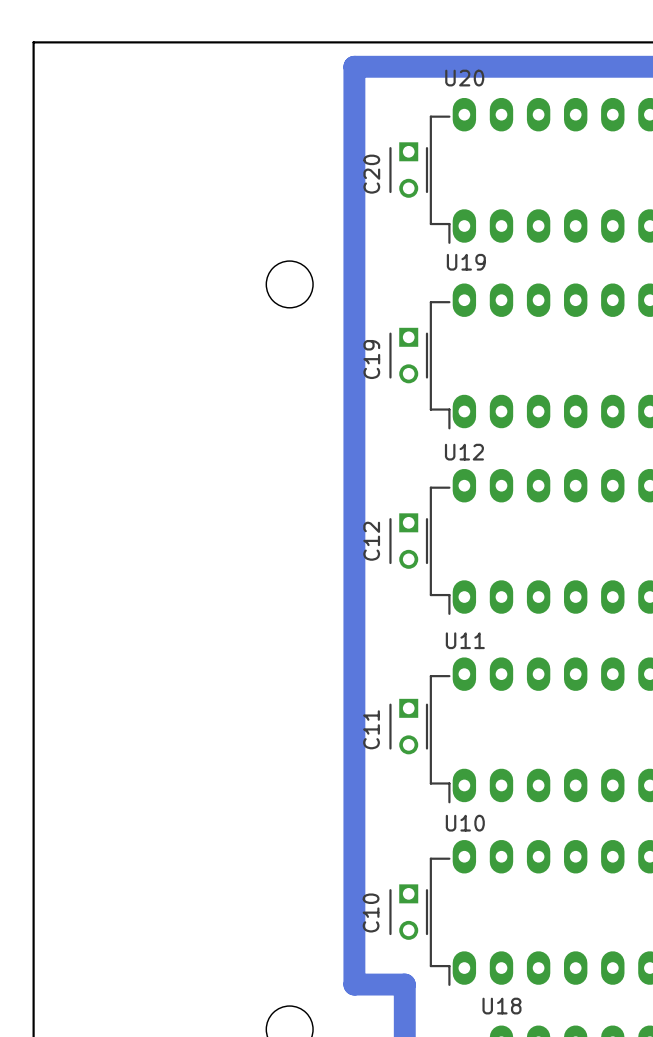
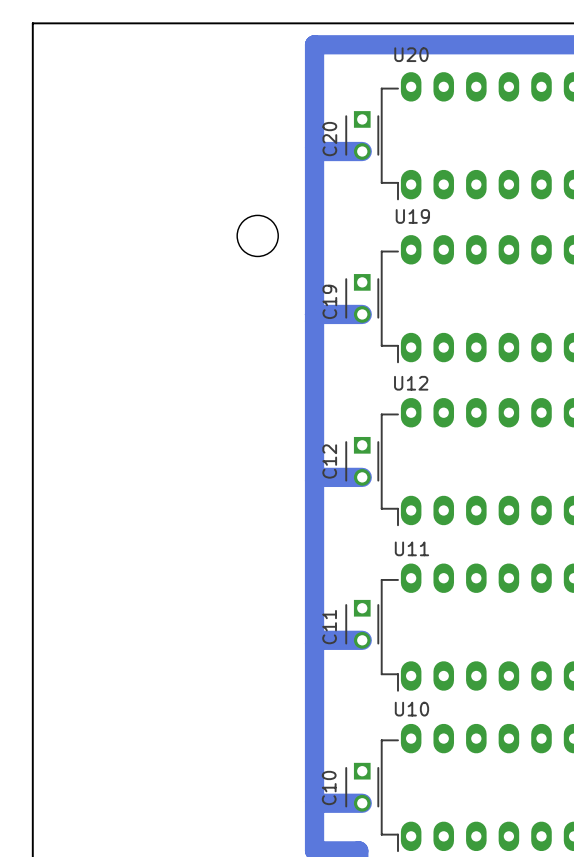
bottom track: none -> (314, 147) (318, 151) (362, 151)
bottom track: none -> (314, 314) (362, 314)
bottom track: none -> (362, 477) (317, 477) (314, 480)
bottom track: none -> (362, 640) (318, 640) (314, 643)
bottom track: none -> (314, 801) (362, 803)

